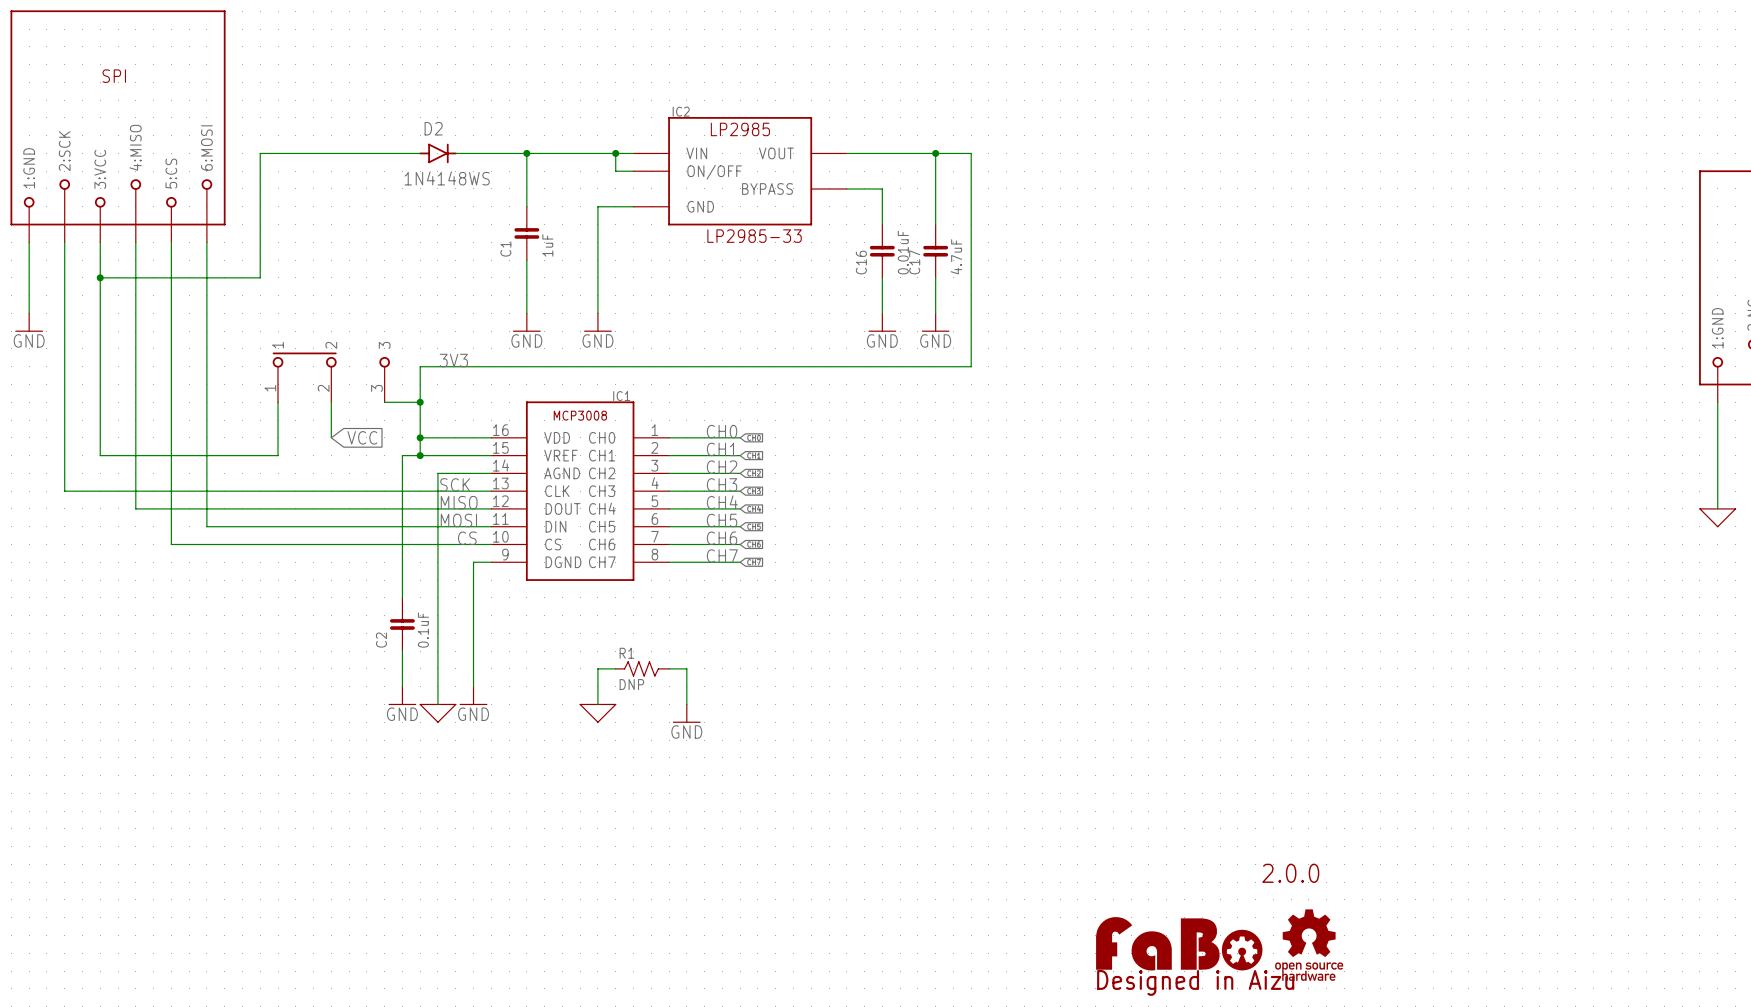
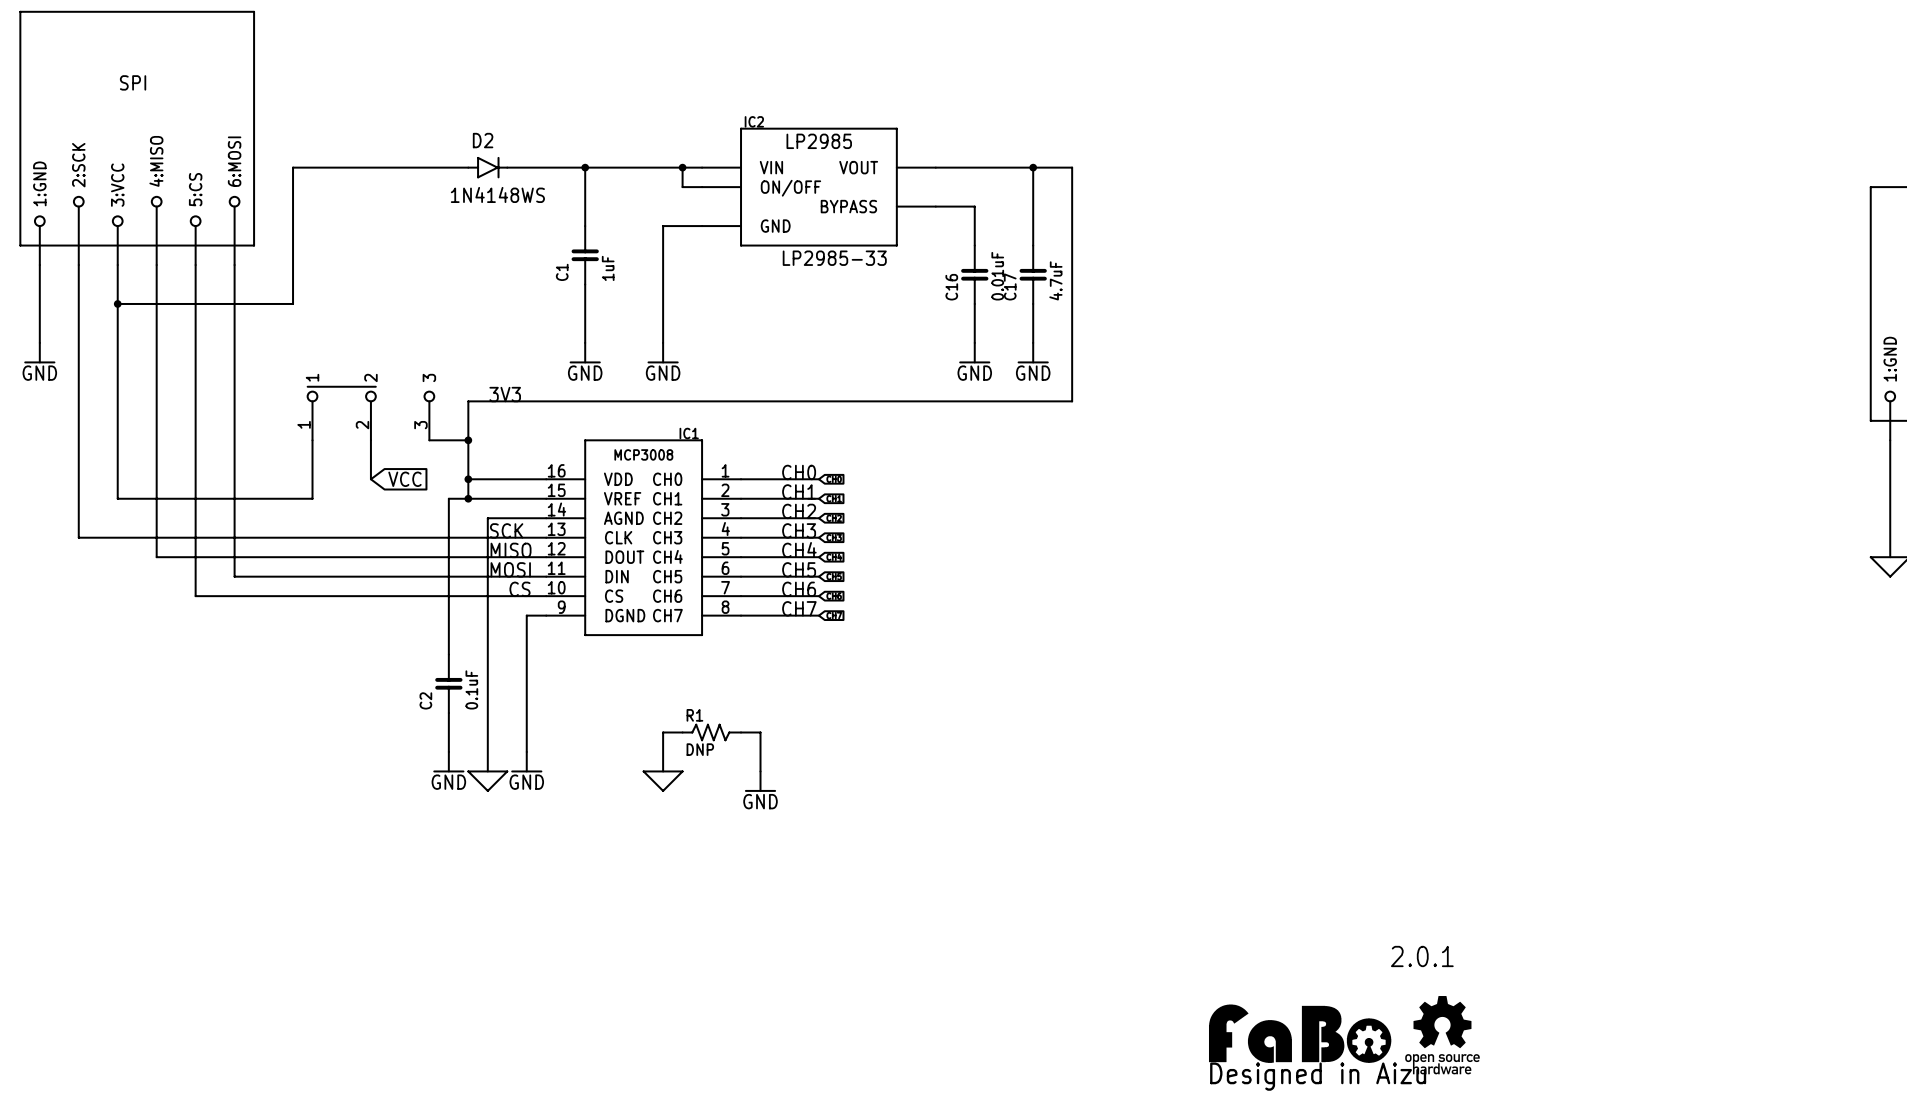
text: 2.0.0 (1290, 873) -> 2.0.1 (1422, 956)

